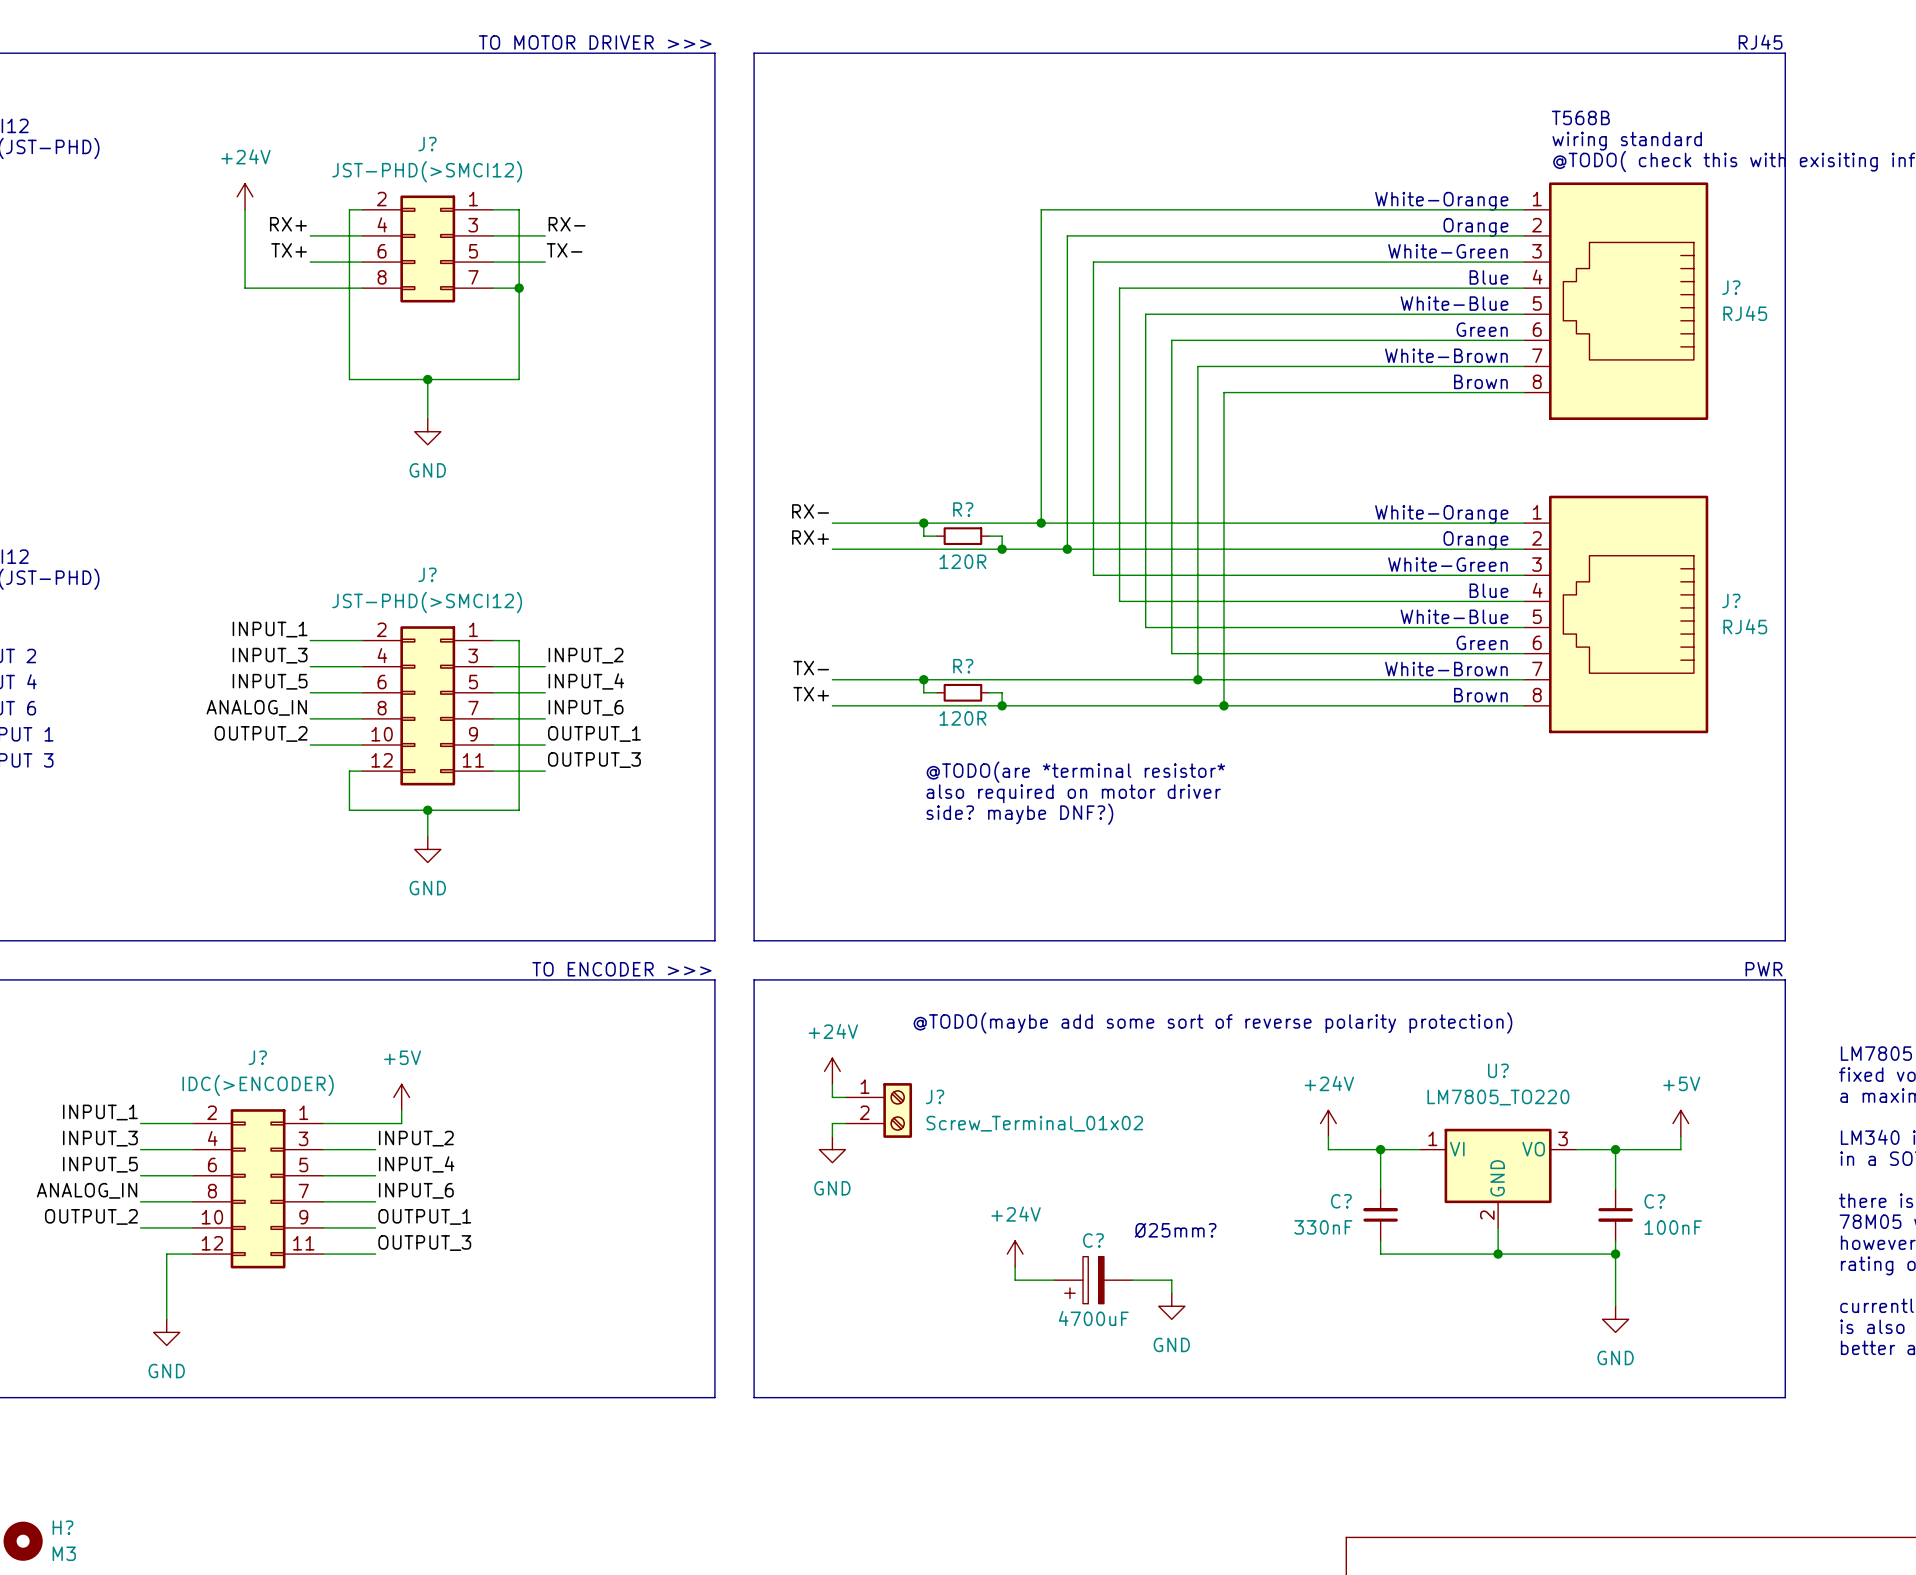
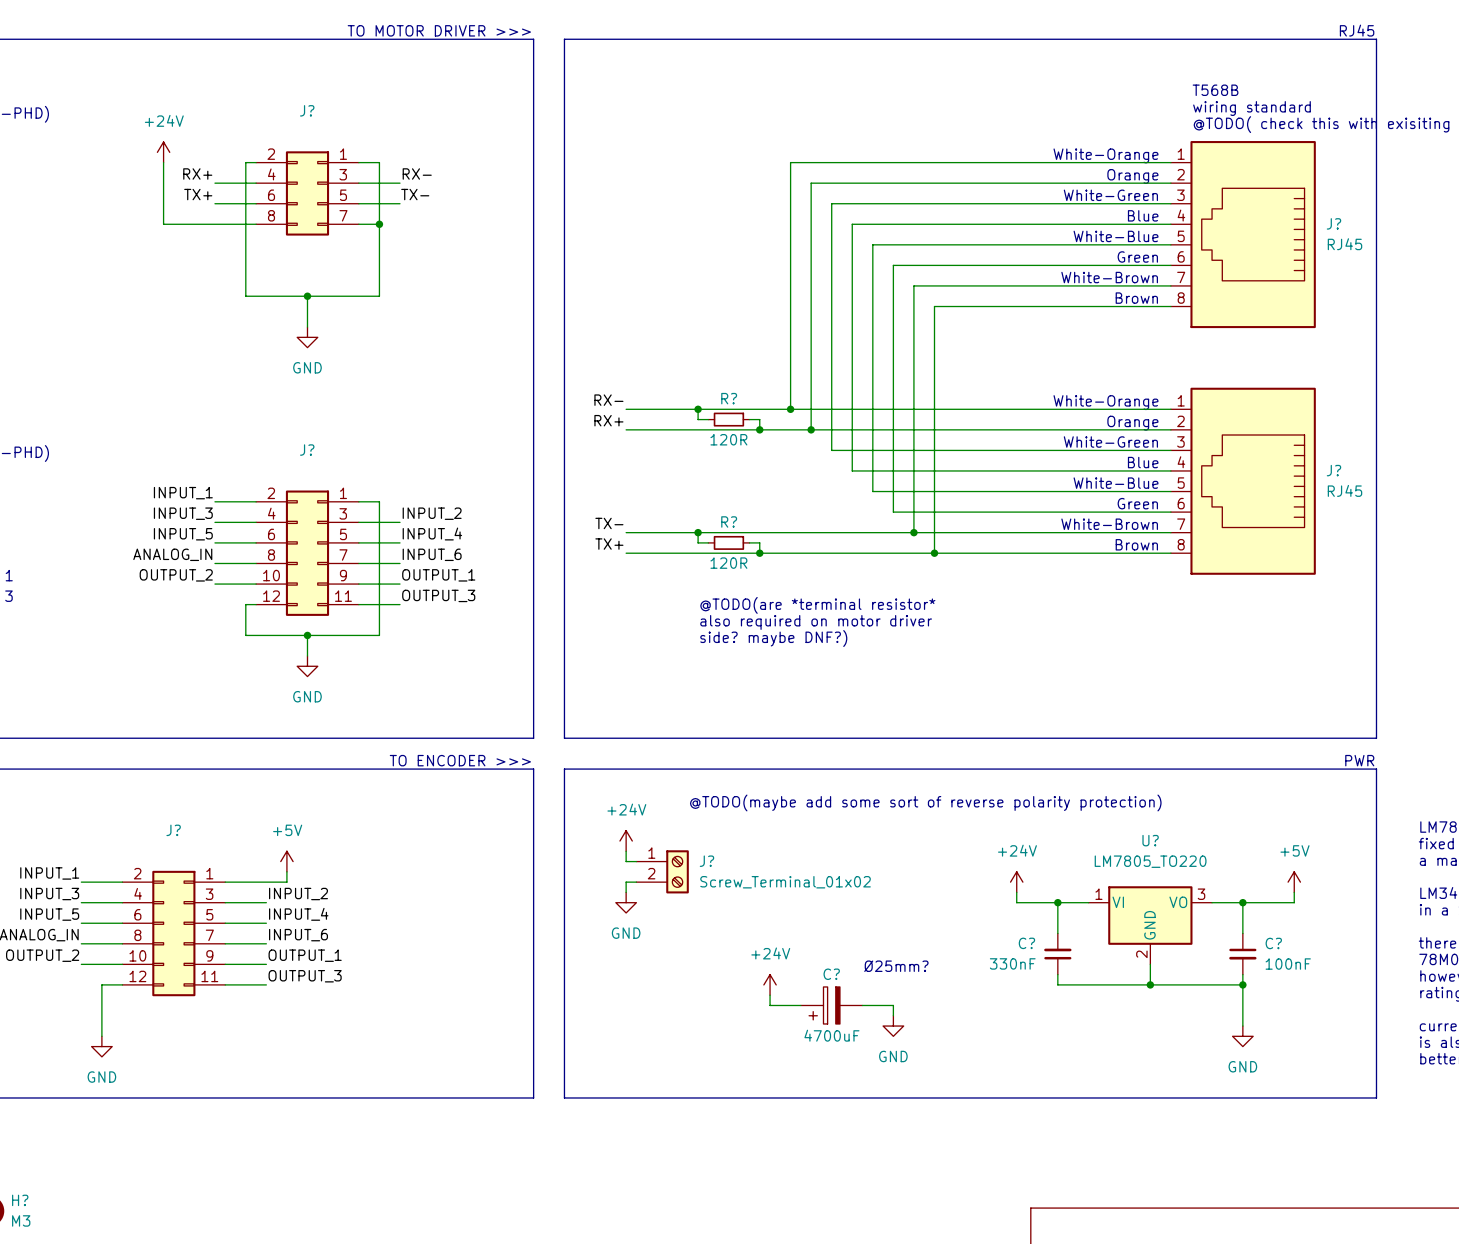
J? value: JST-PHD(>SMCI12) (427, 171) -> none
J? value: JST-PHD(>SMCI12) (427, 602) -> none
J? value: IDC(>ENCODER) (258, 1085) -> none

